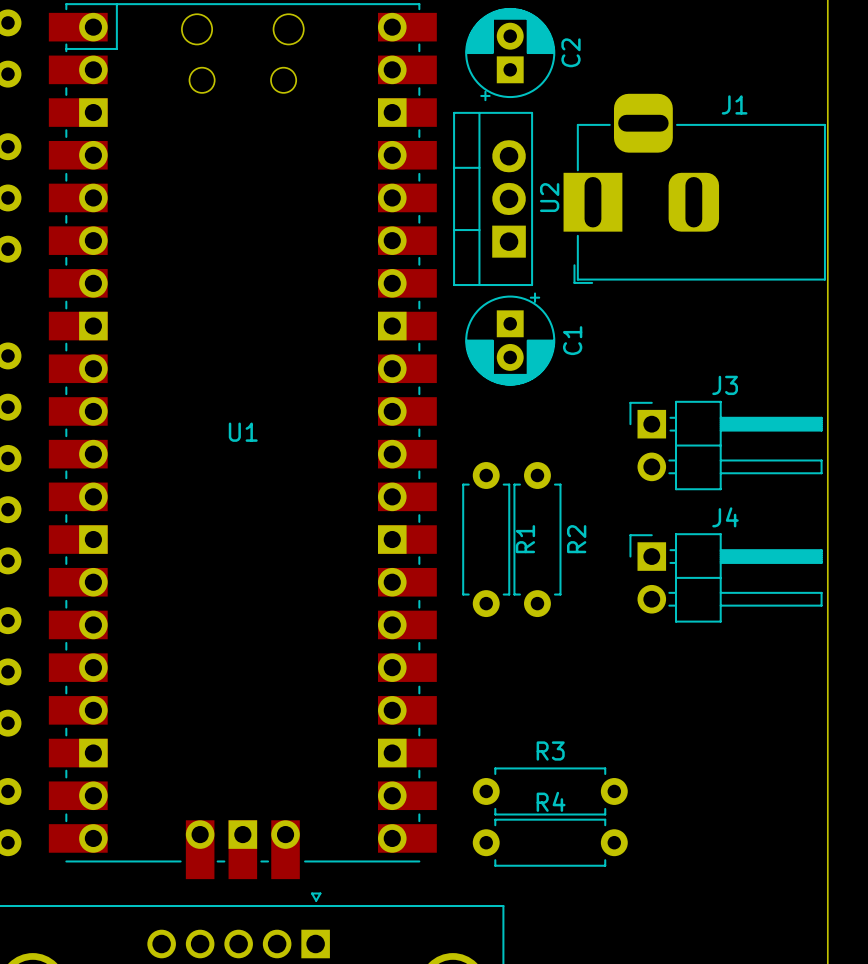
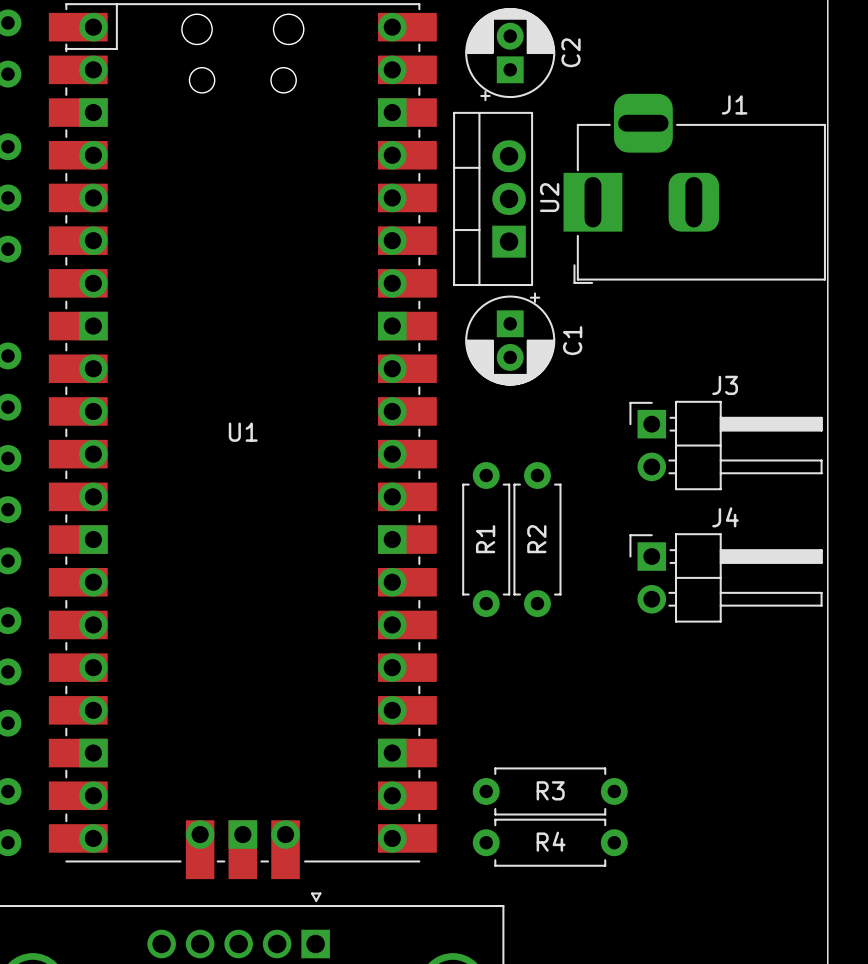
R1 name position: R1 (525, 539) -> R1 (485, 539)
R2 name position: R2 (576, 539) -> R2 (536, 539)
R3 name position: R3 (550, 751) -> R3 (550, 790)
R4 name position: R4 (551, 801) -> R4 (551, 841)

